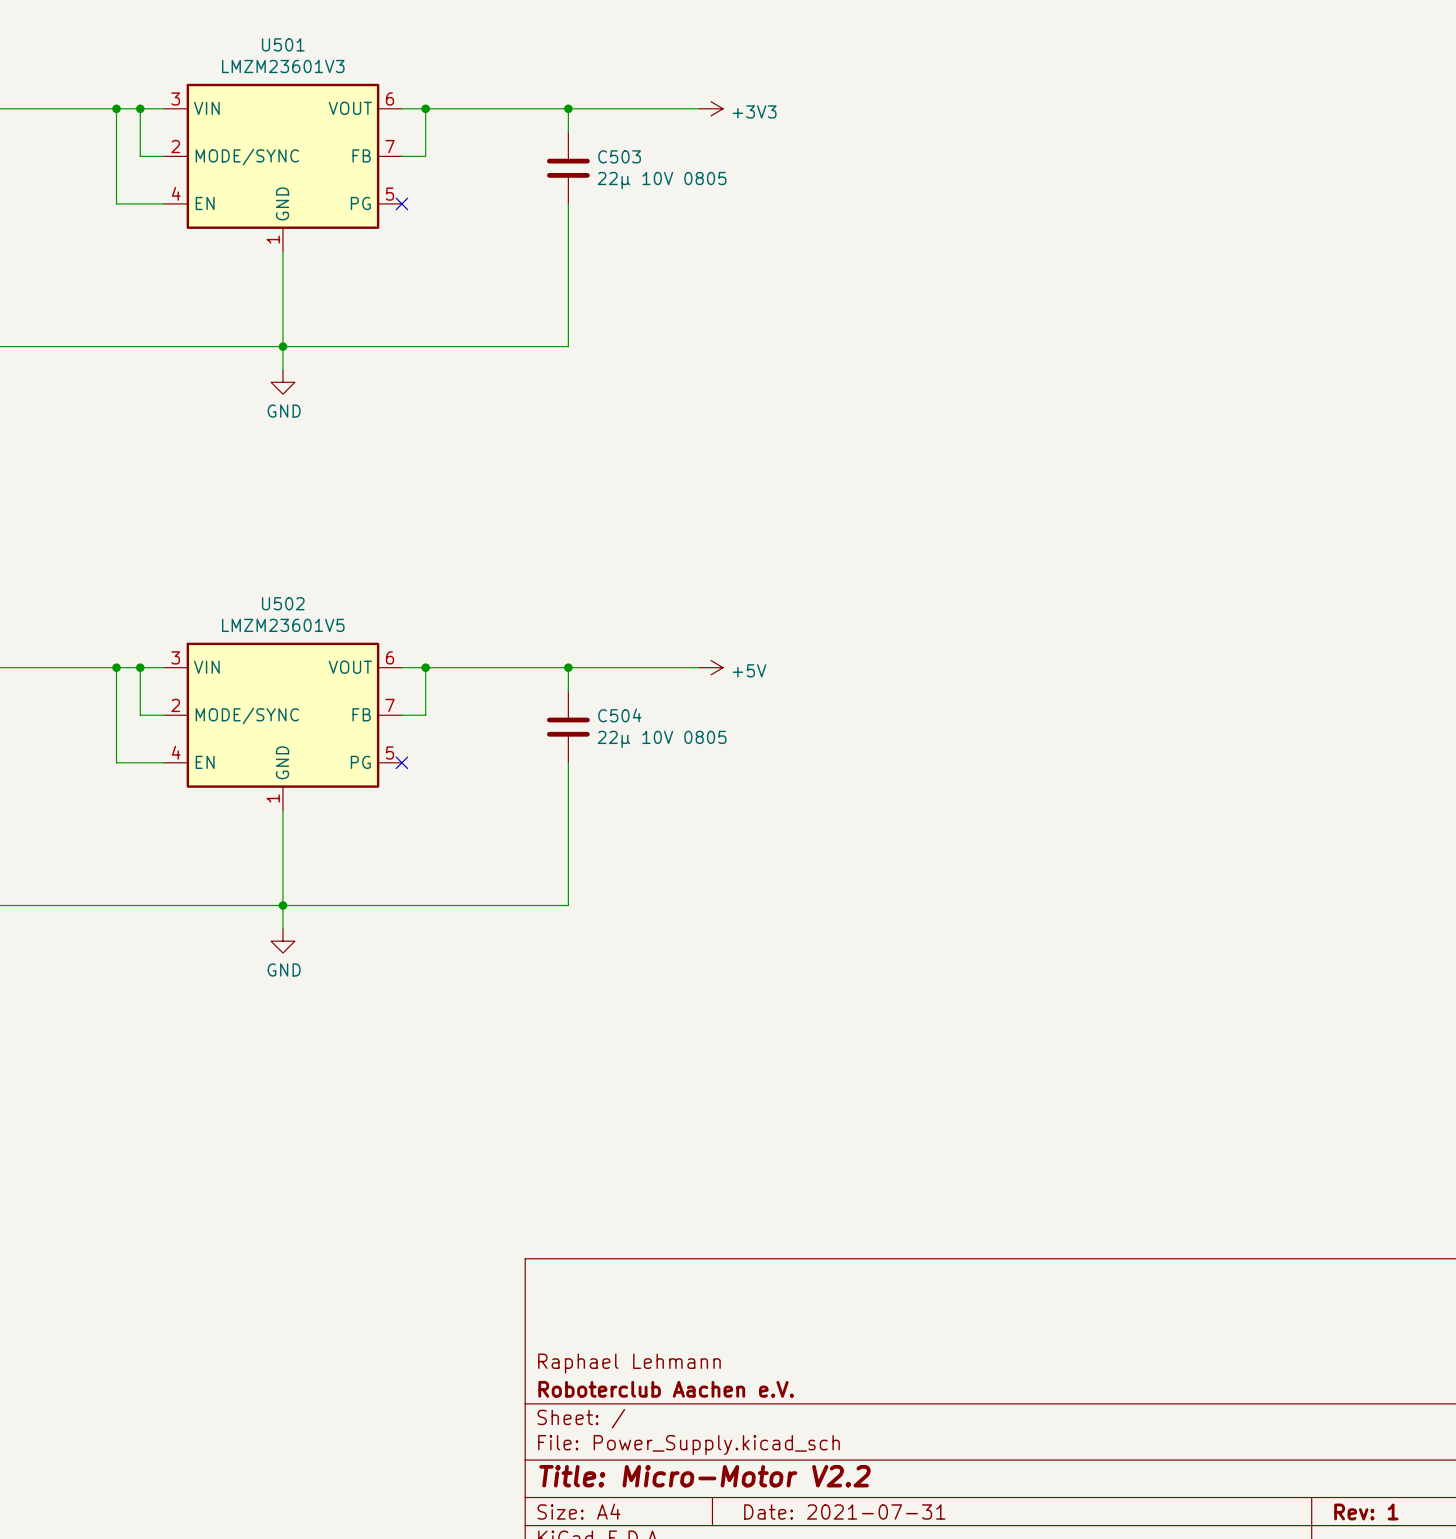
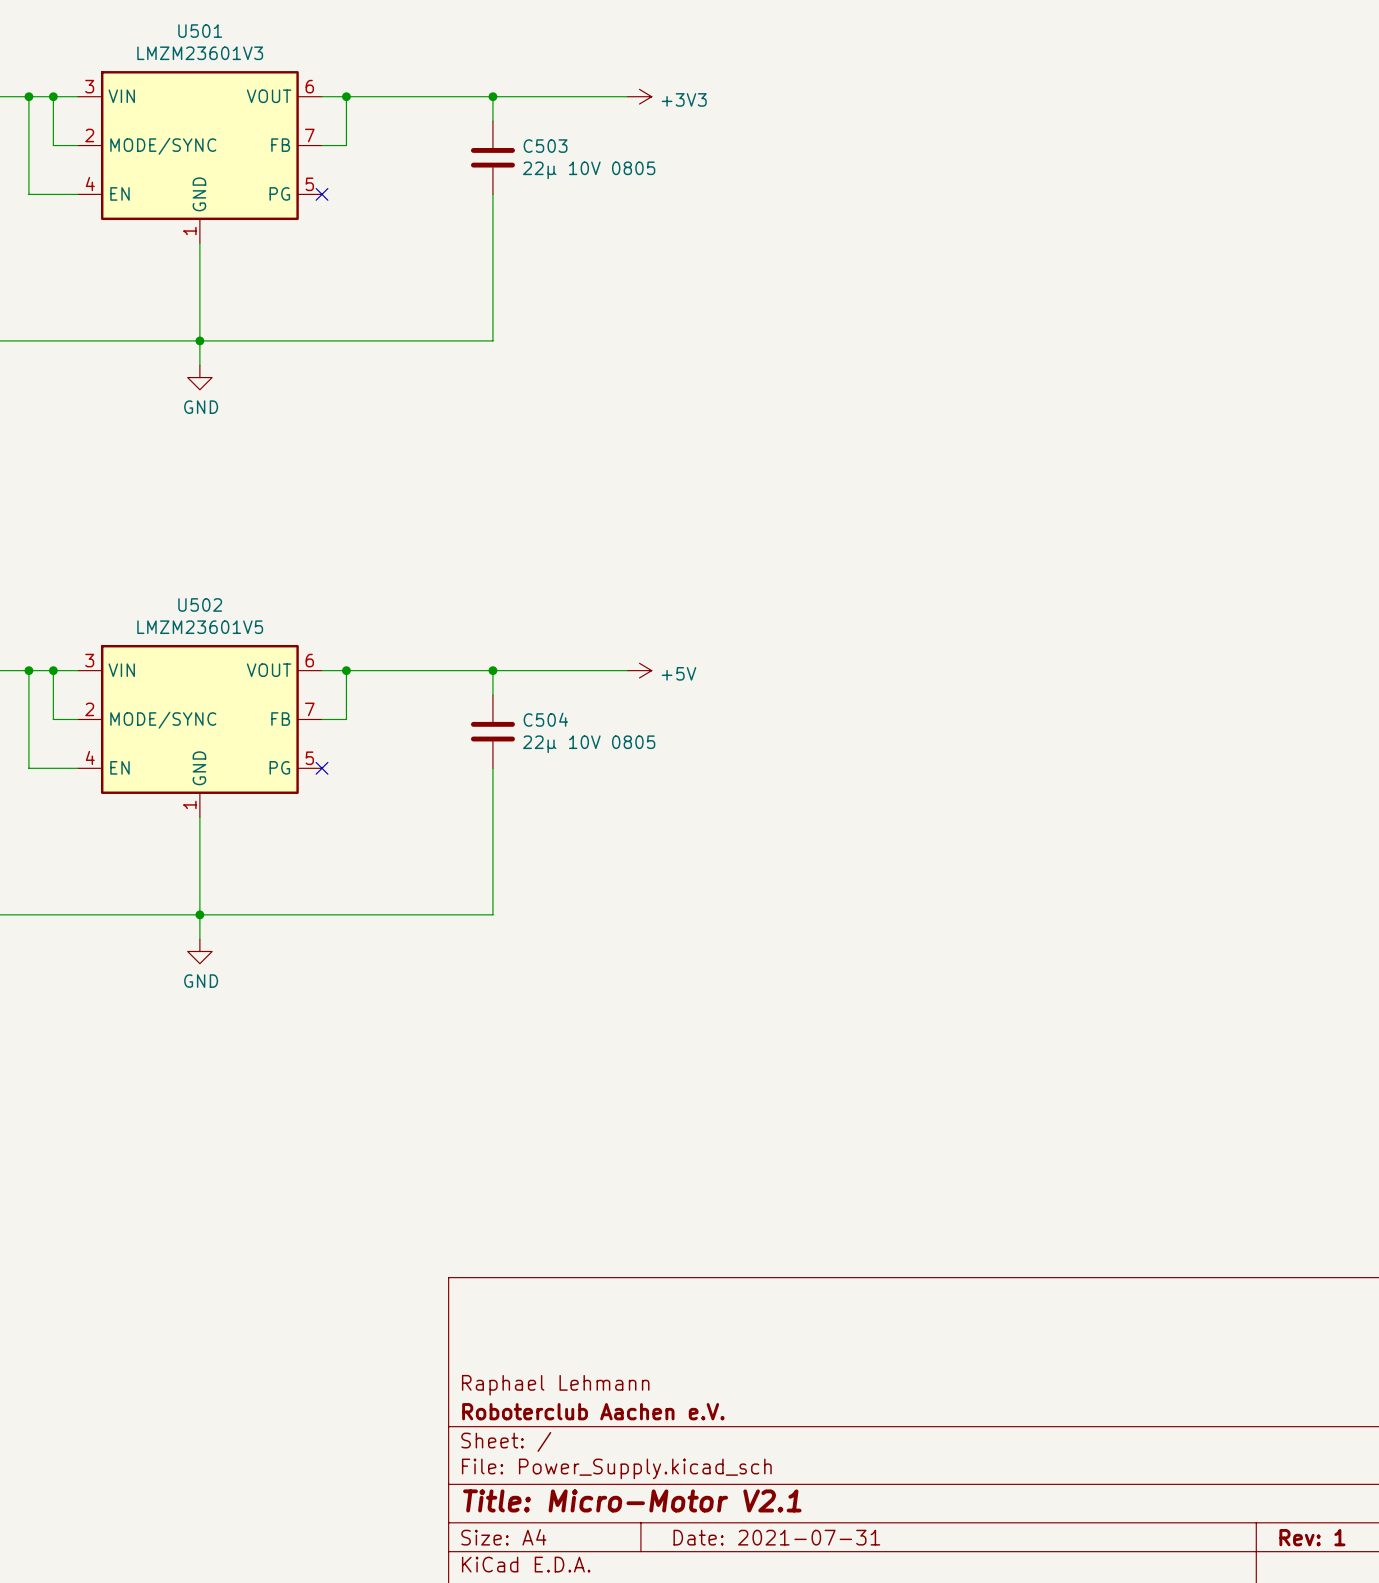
title block: Title: Micro-Motor V2.2 (705, 1476) -> Title: Micro-Motor V2.1 (632, 1500)

